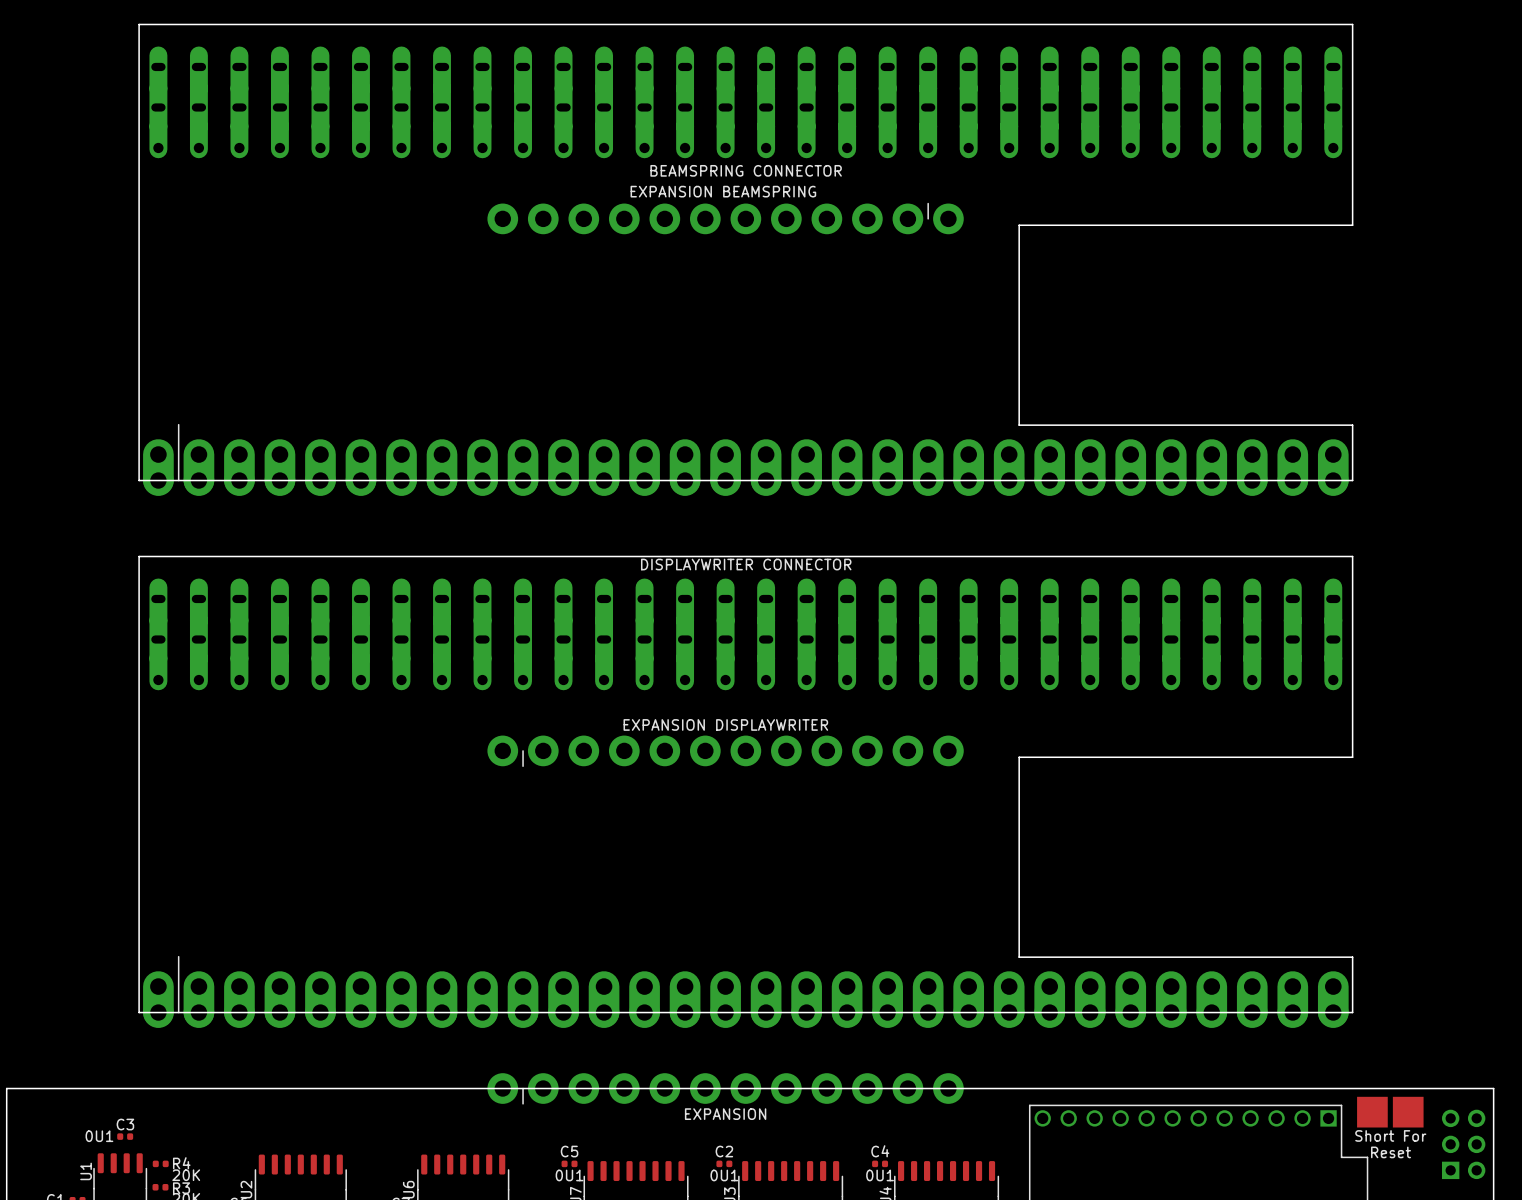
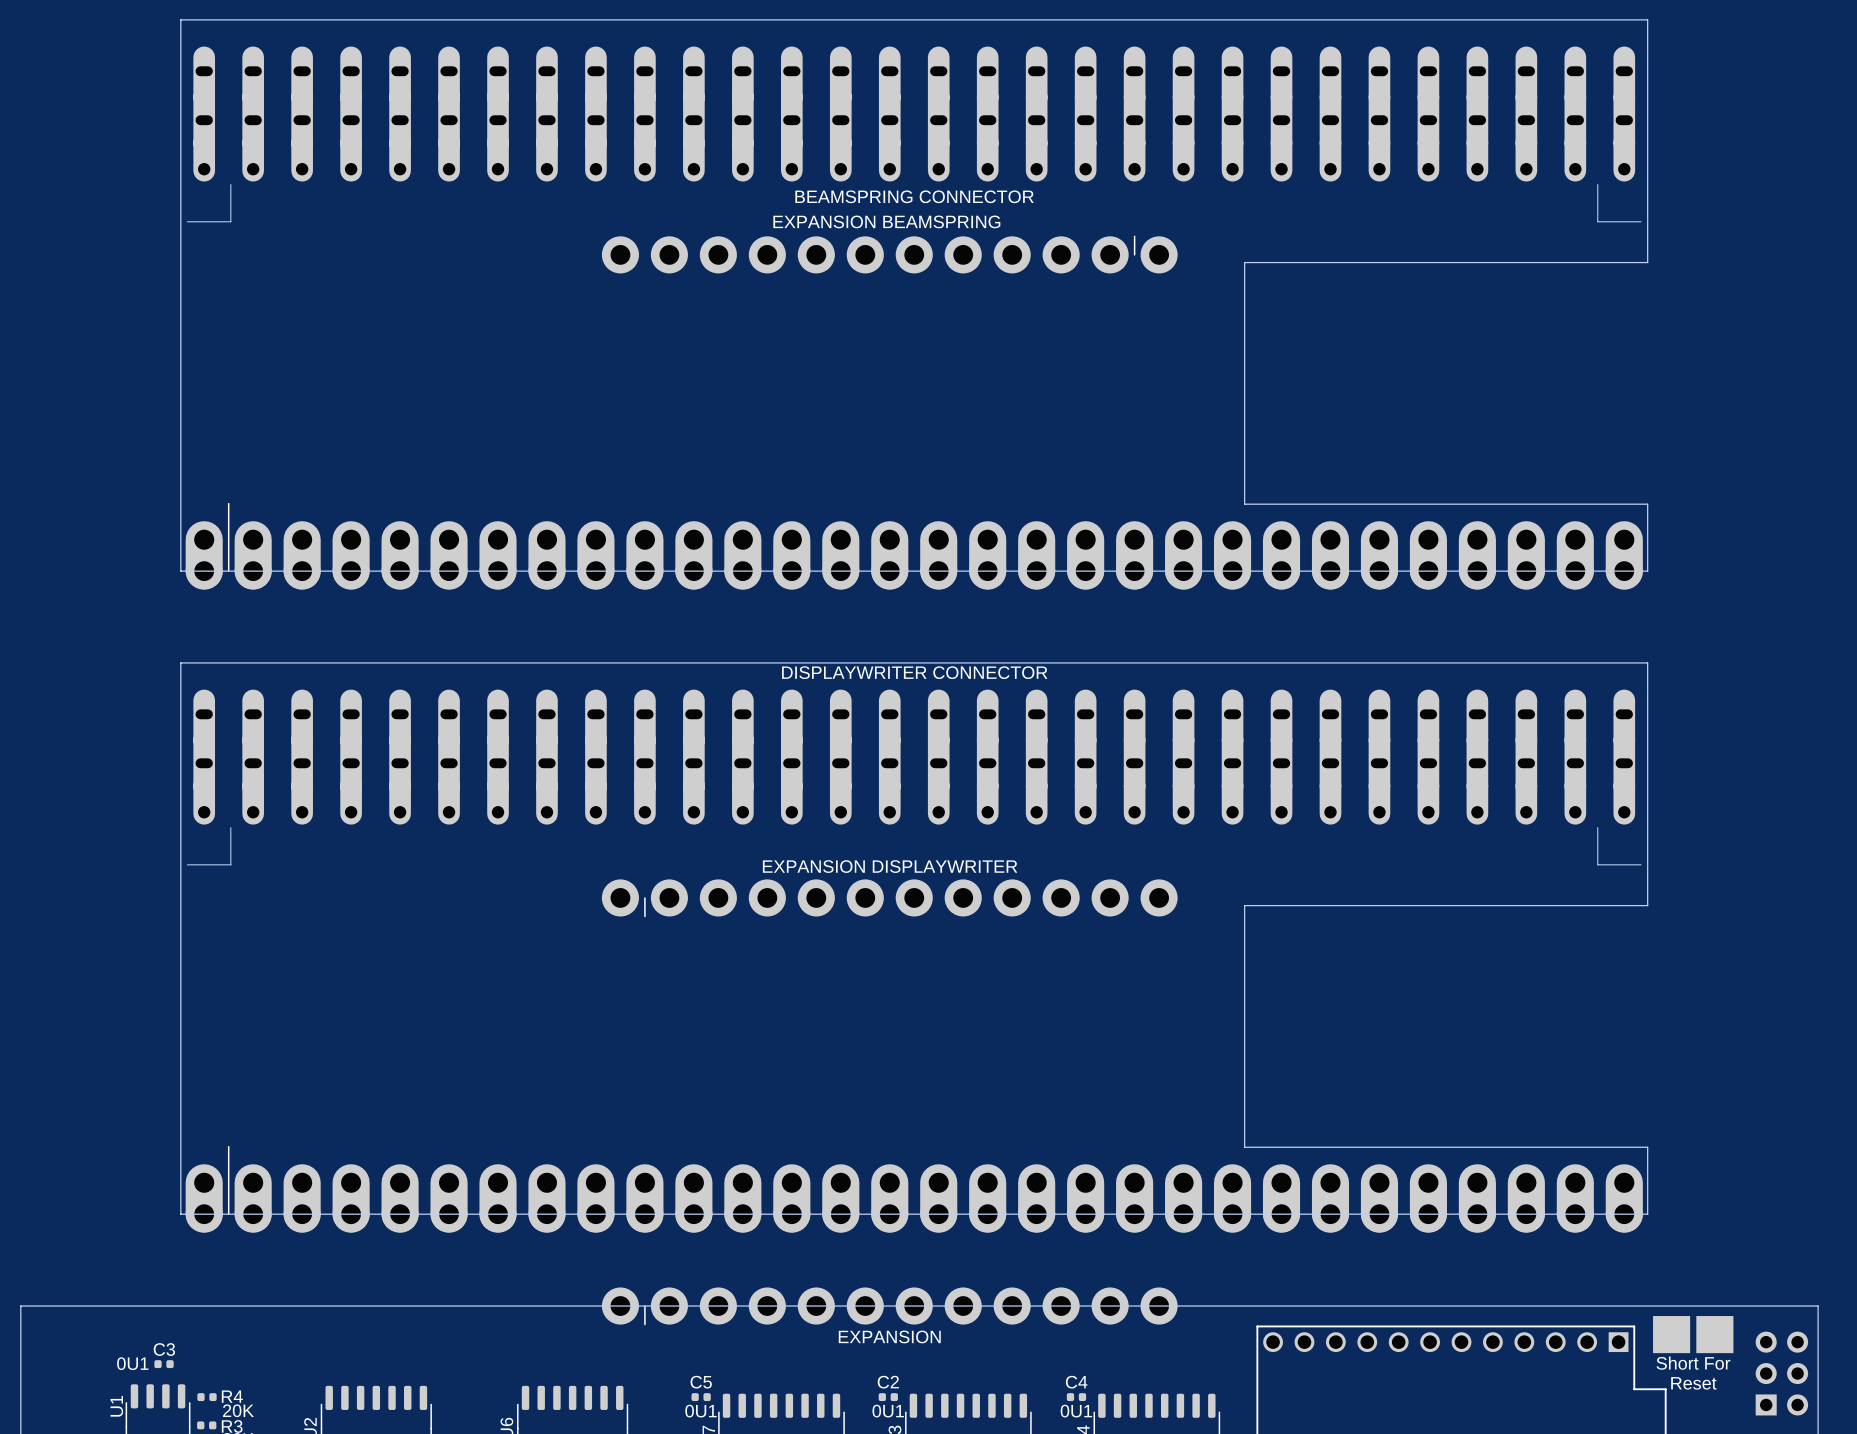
part: none -> BEAMSPRING CONNECTOR (914, 134)
part: none -> DISPLAYWRITER CONNECTOR (914, 777)

